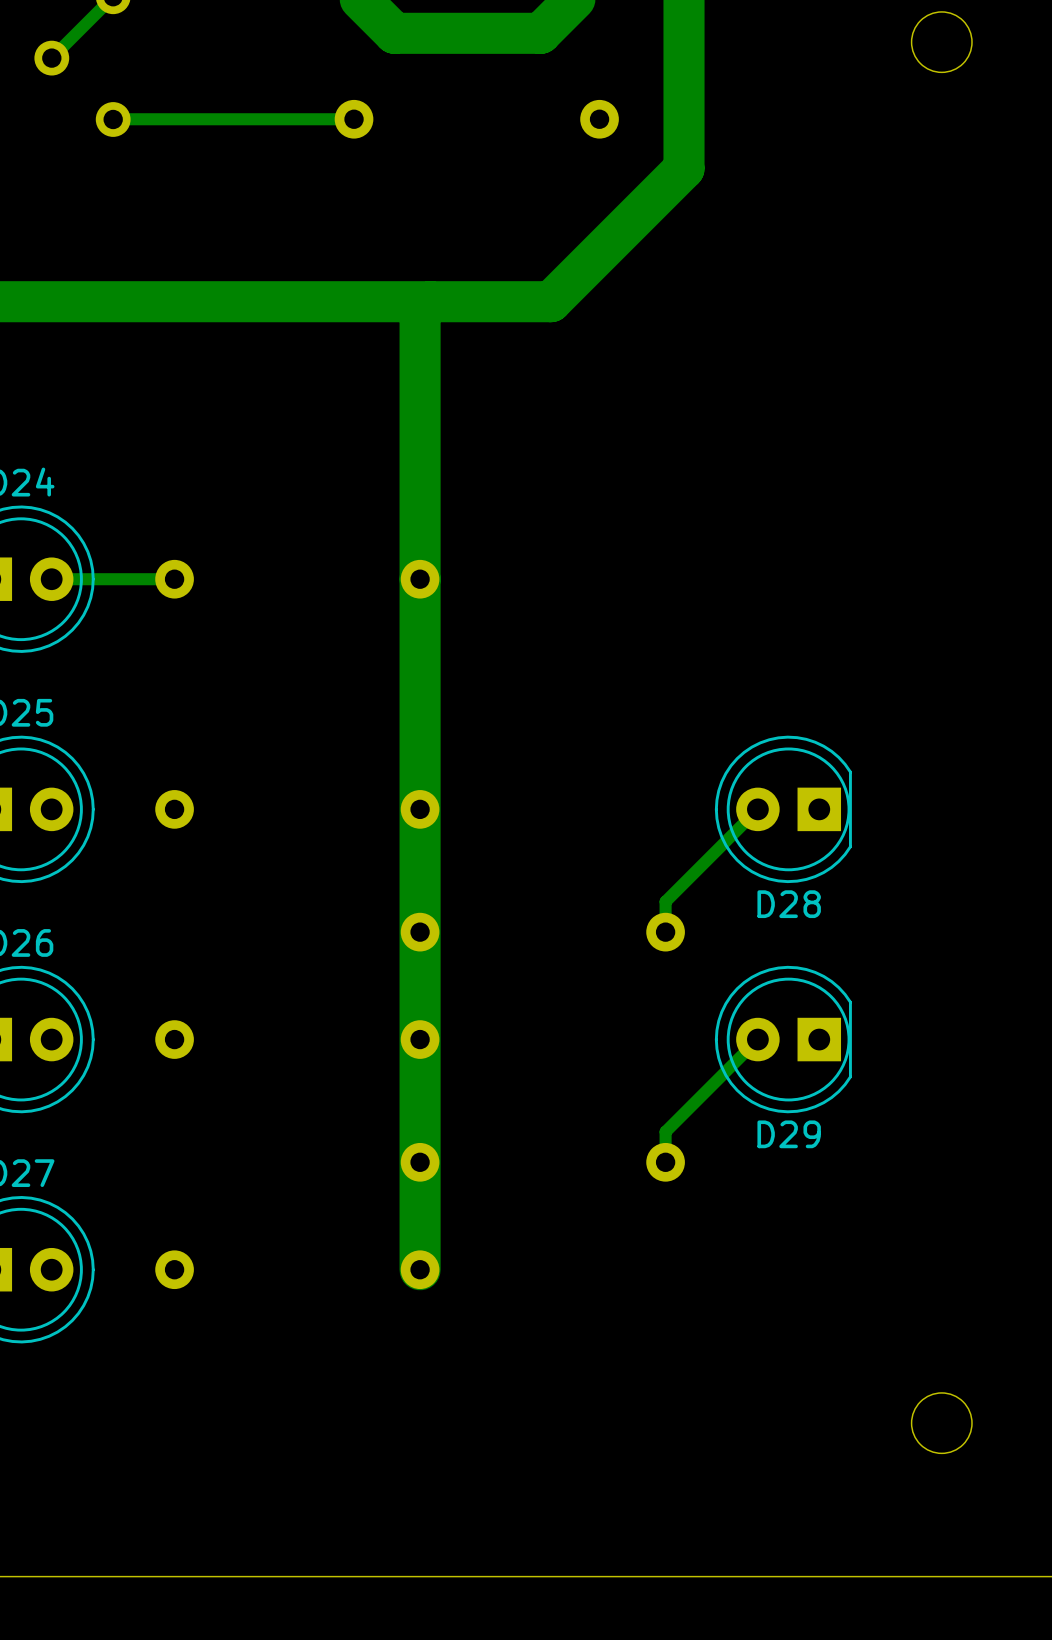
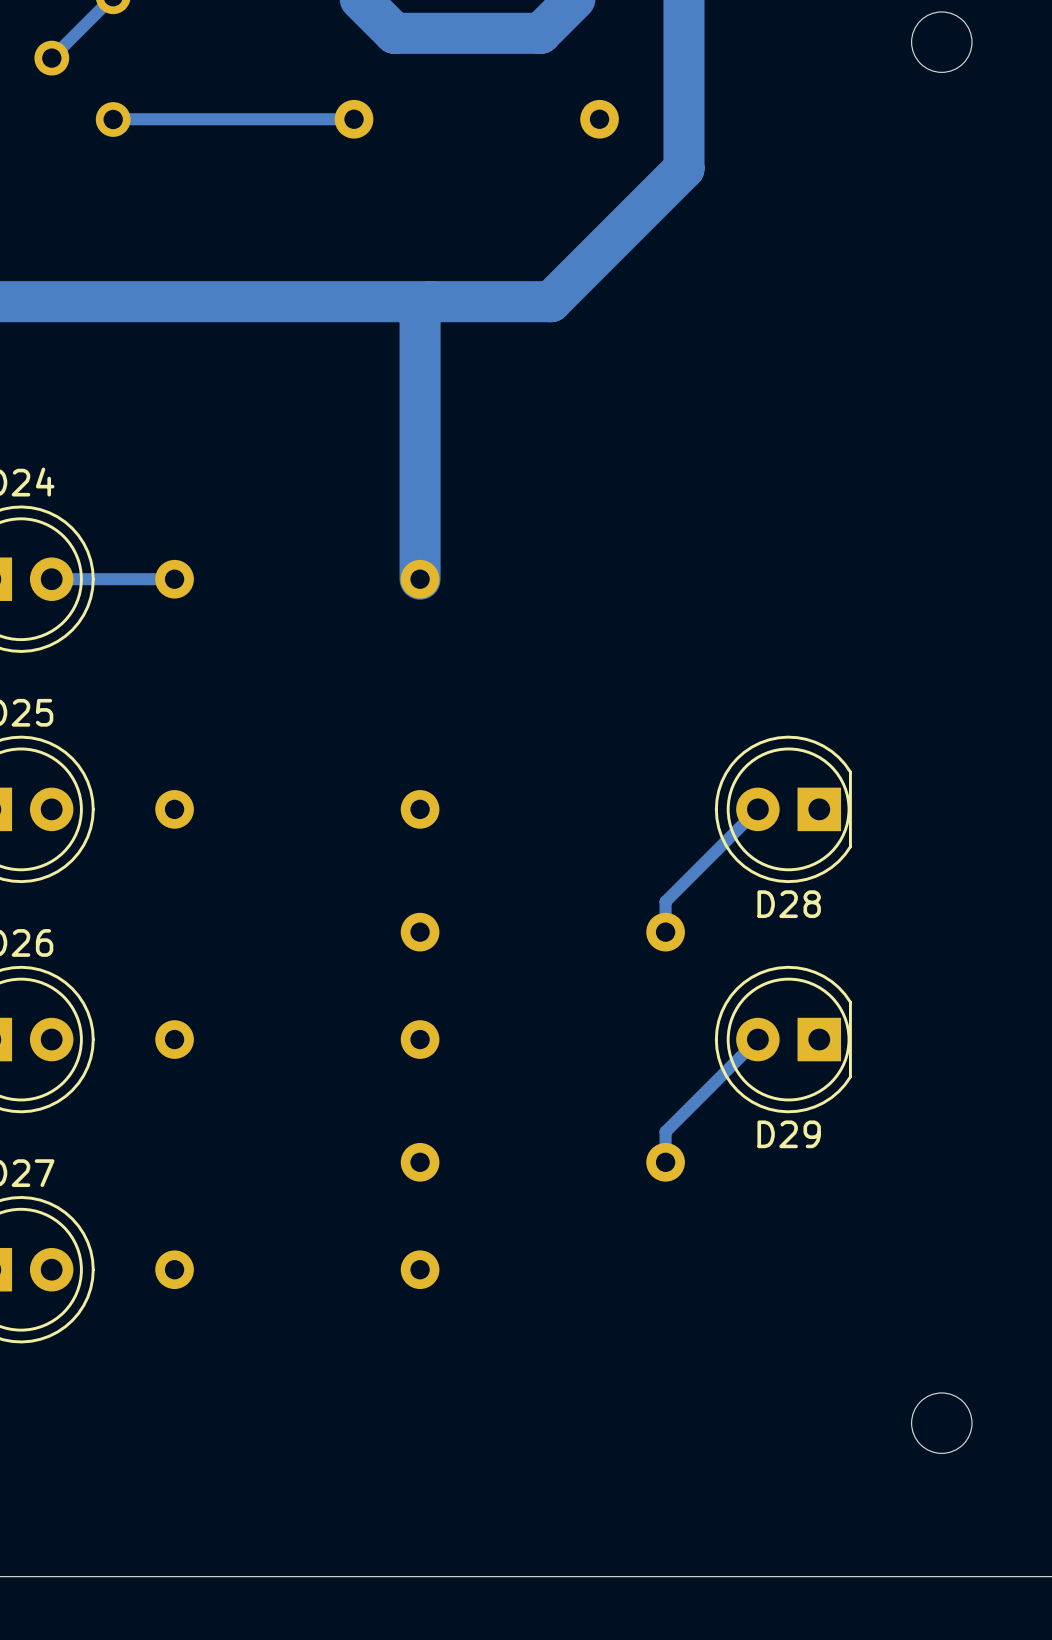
track: (420, 579) (420, 1269) -> none

